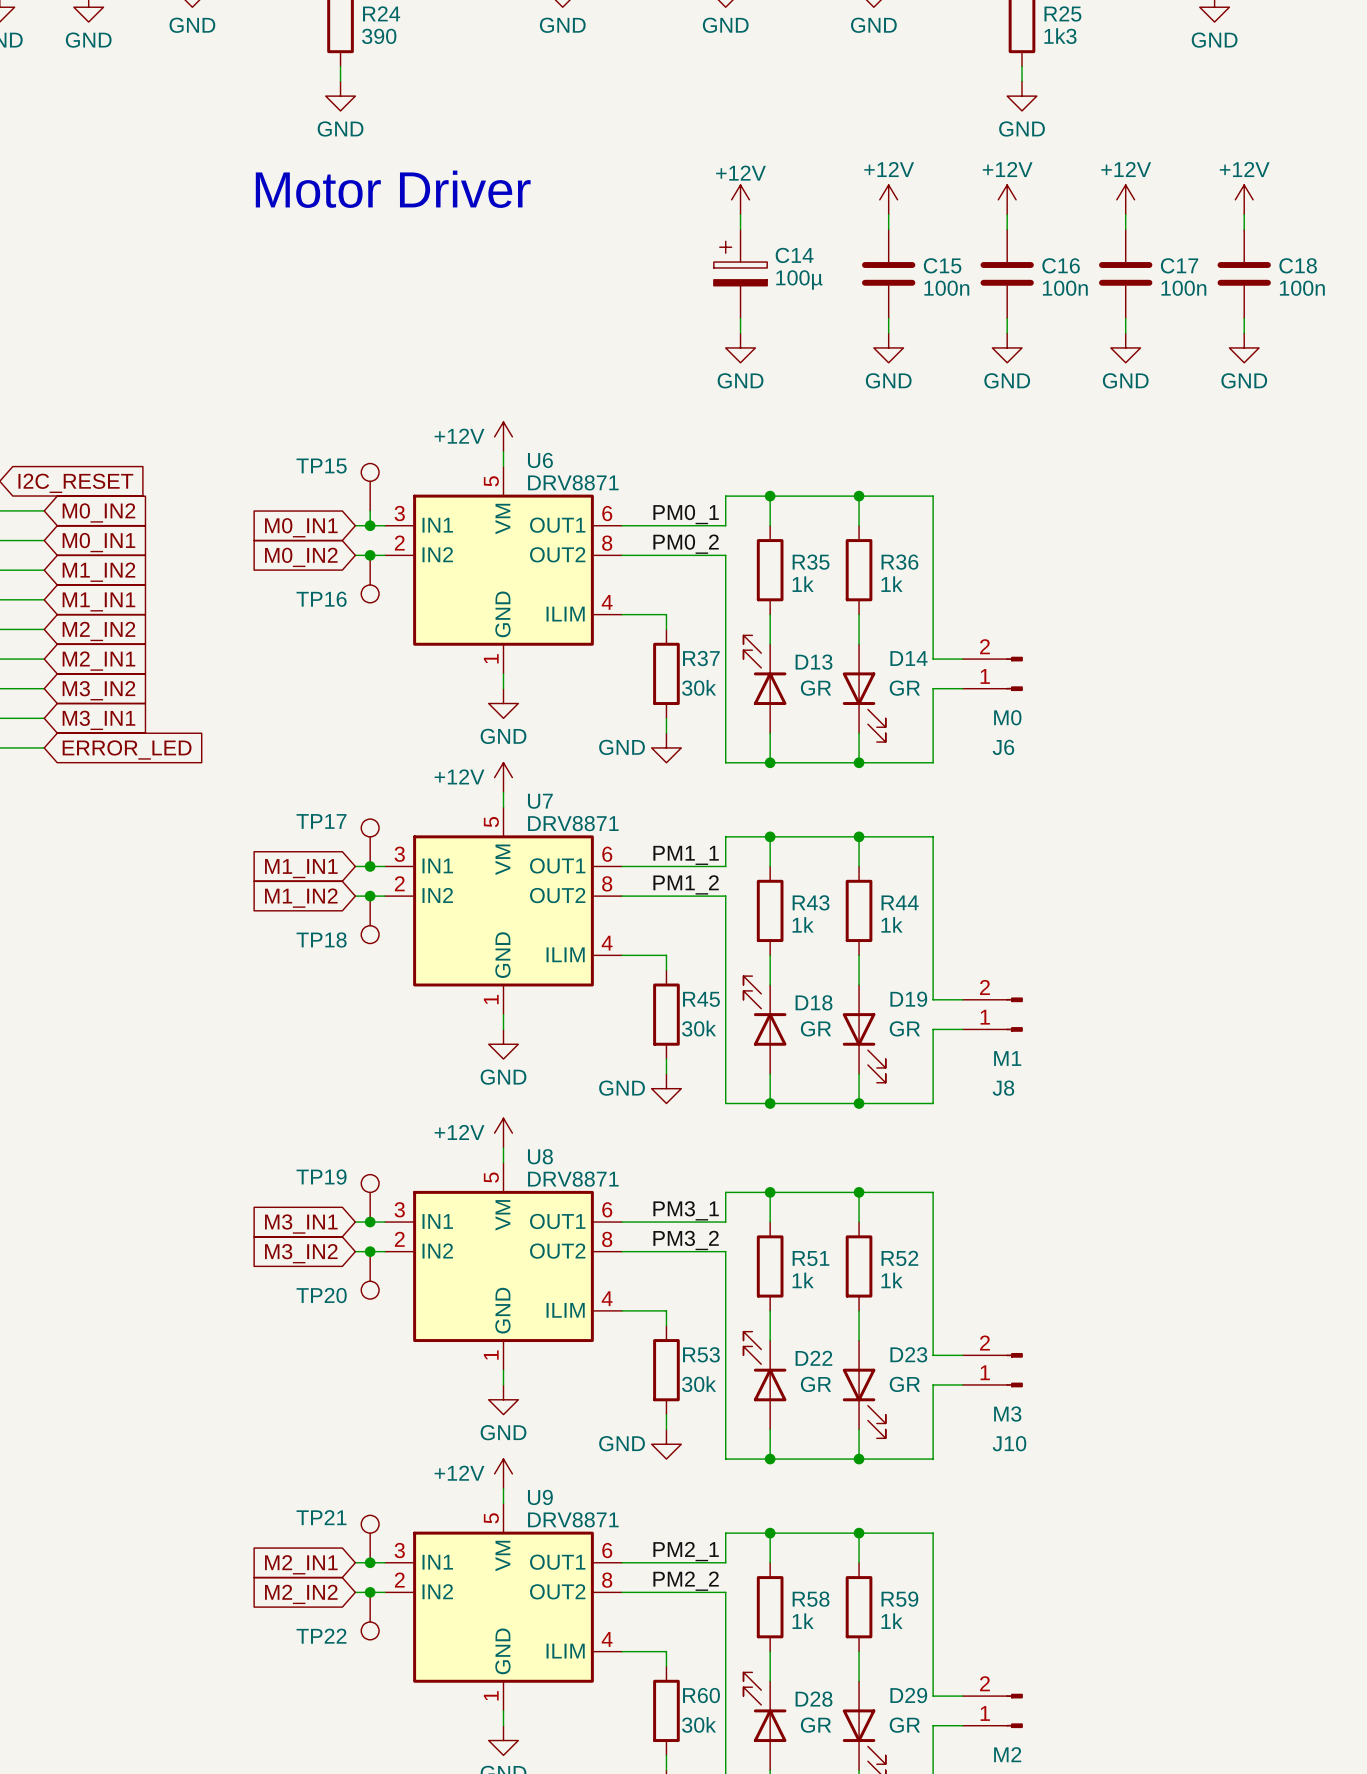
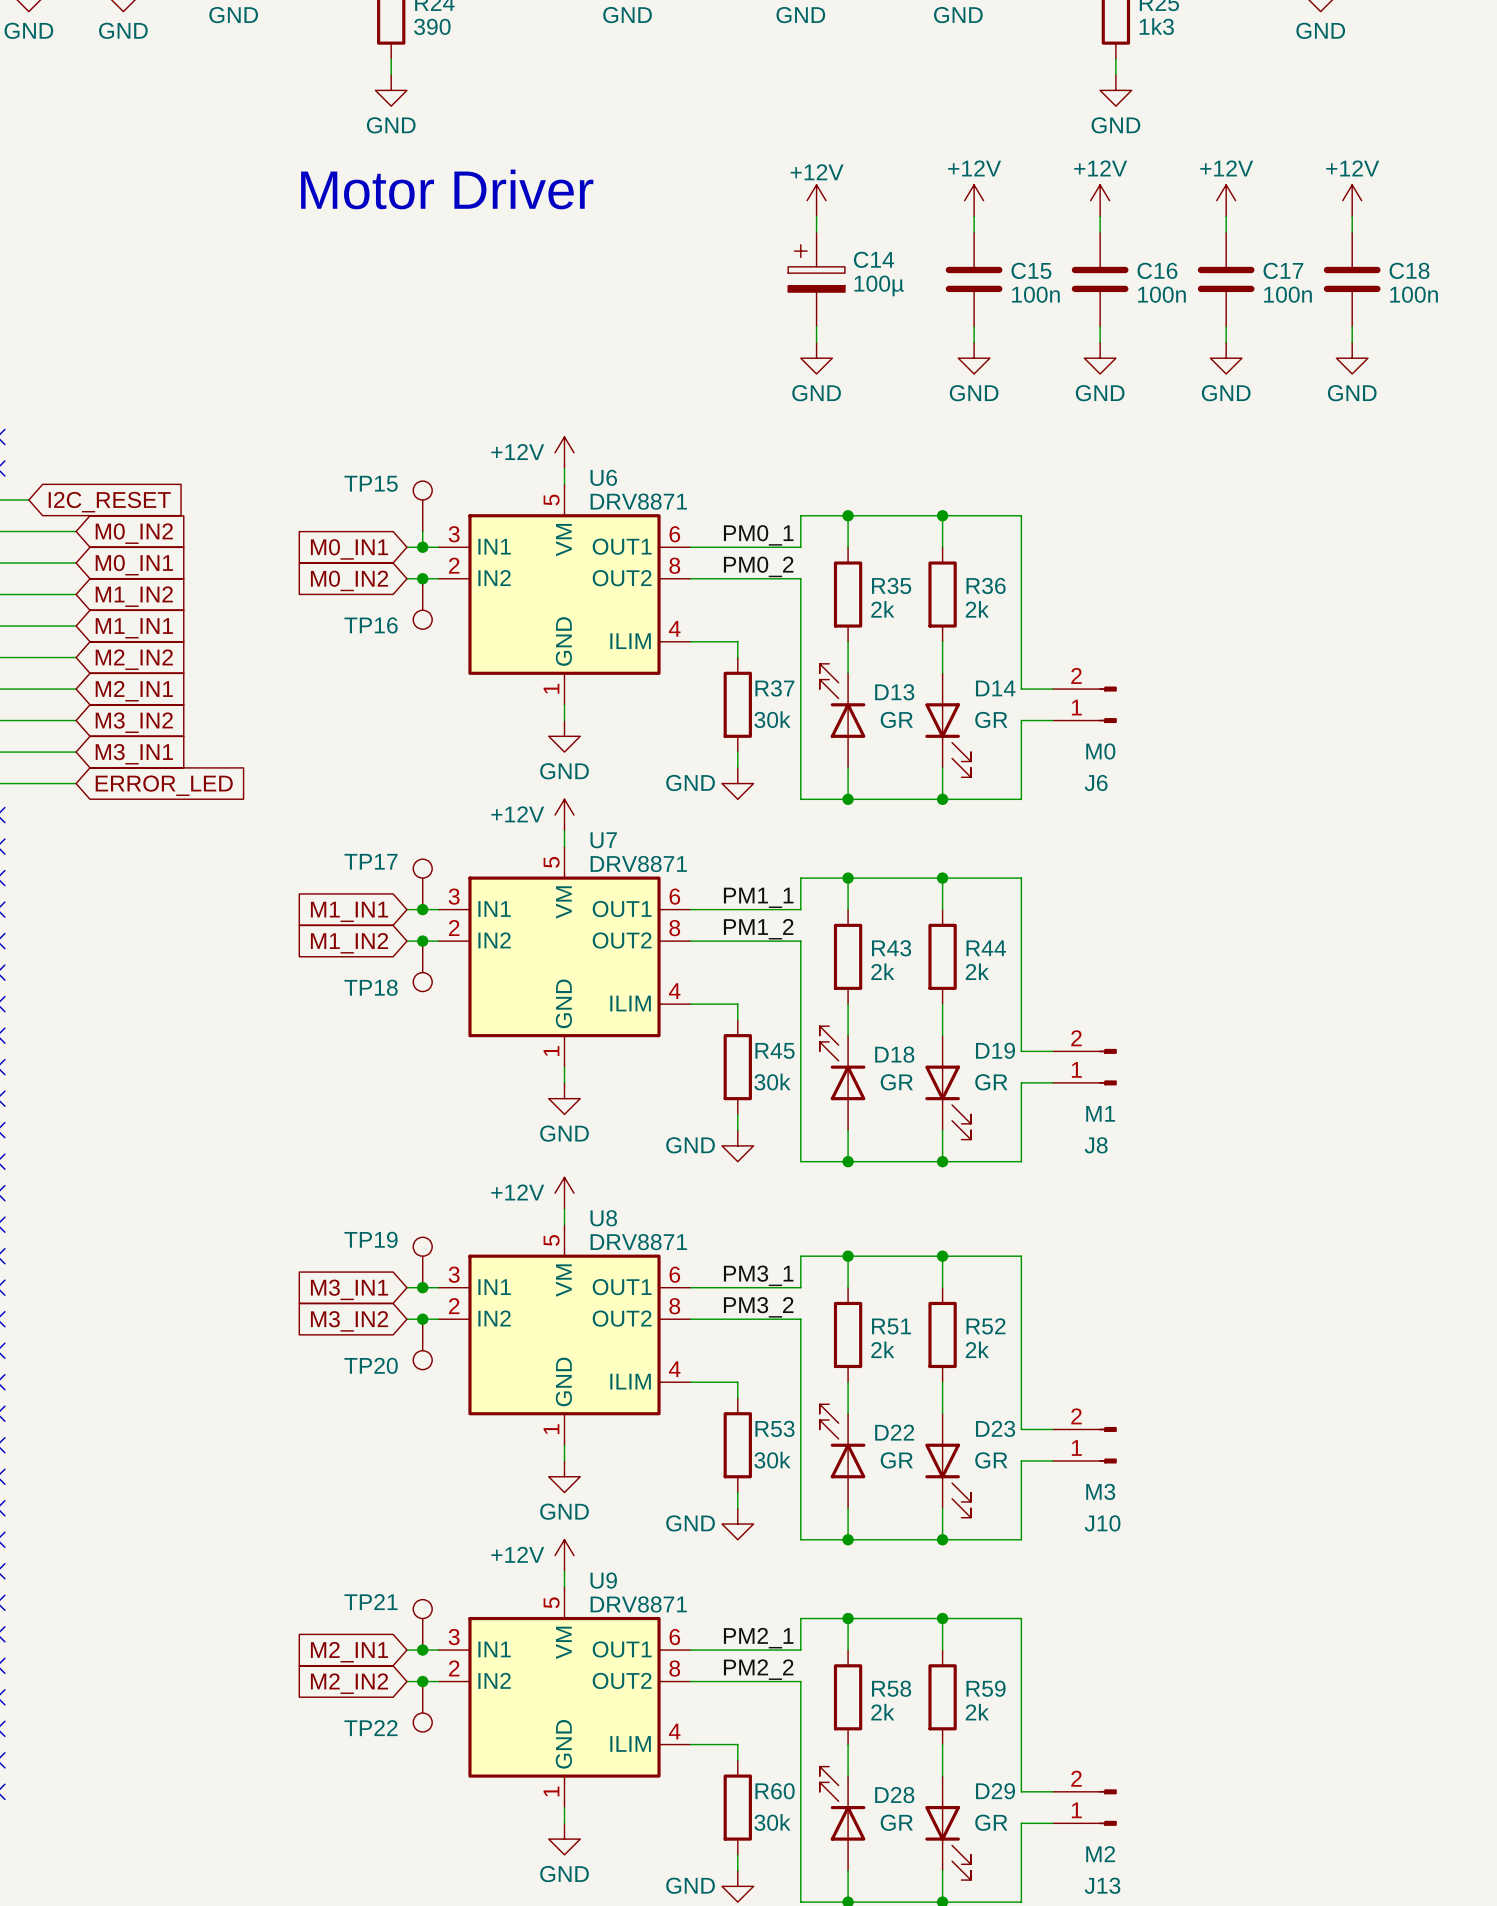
R35 value: 1k (803, 584) -> 2k (882, 609)
R36 value: 1k (891, 584) -> 2k (977, 609)
R43 value: 1k (803, 924) -> 2k (882, 971)
R44 value: 1k (891, 924) -> 2k (977, 971)
R51 value: 1k (803, 1280) -> 2k (882, 1349)
R52 value: 1k (891, 1280) -> 2k (977, 1349)
R58 value: 1k (803, 1621) -> 2k (882, 1712)
R59 value: 1k (891, 1621) -> 2k (977, 1712)

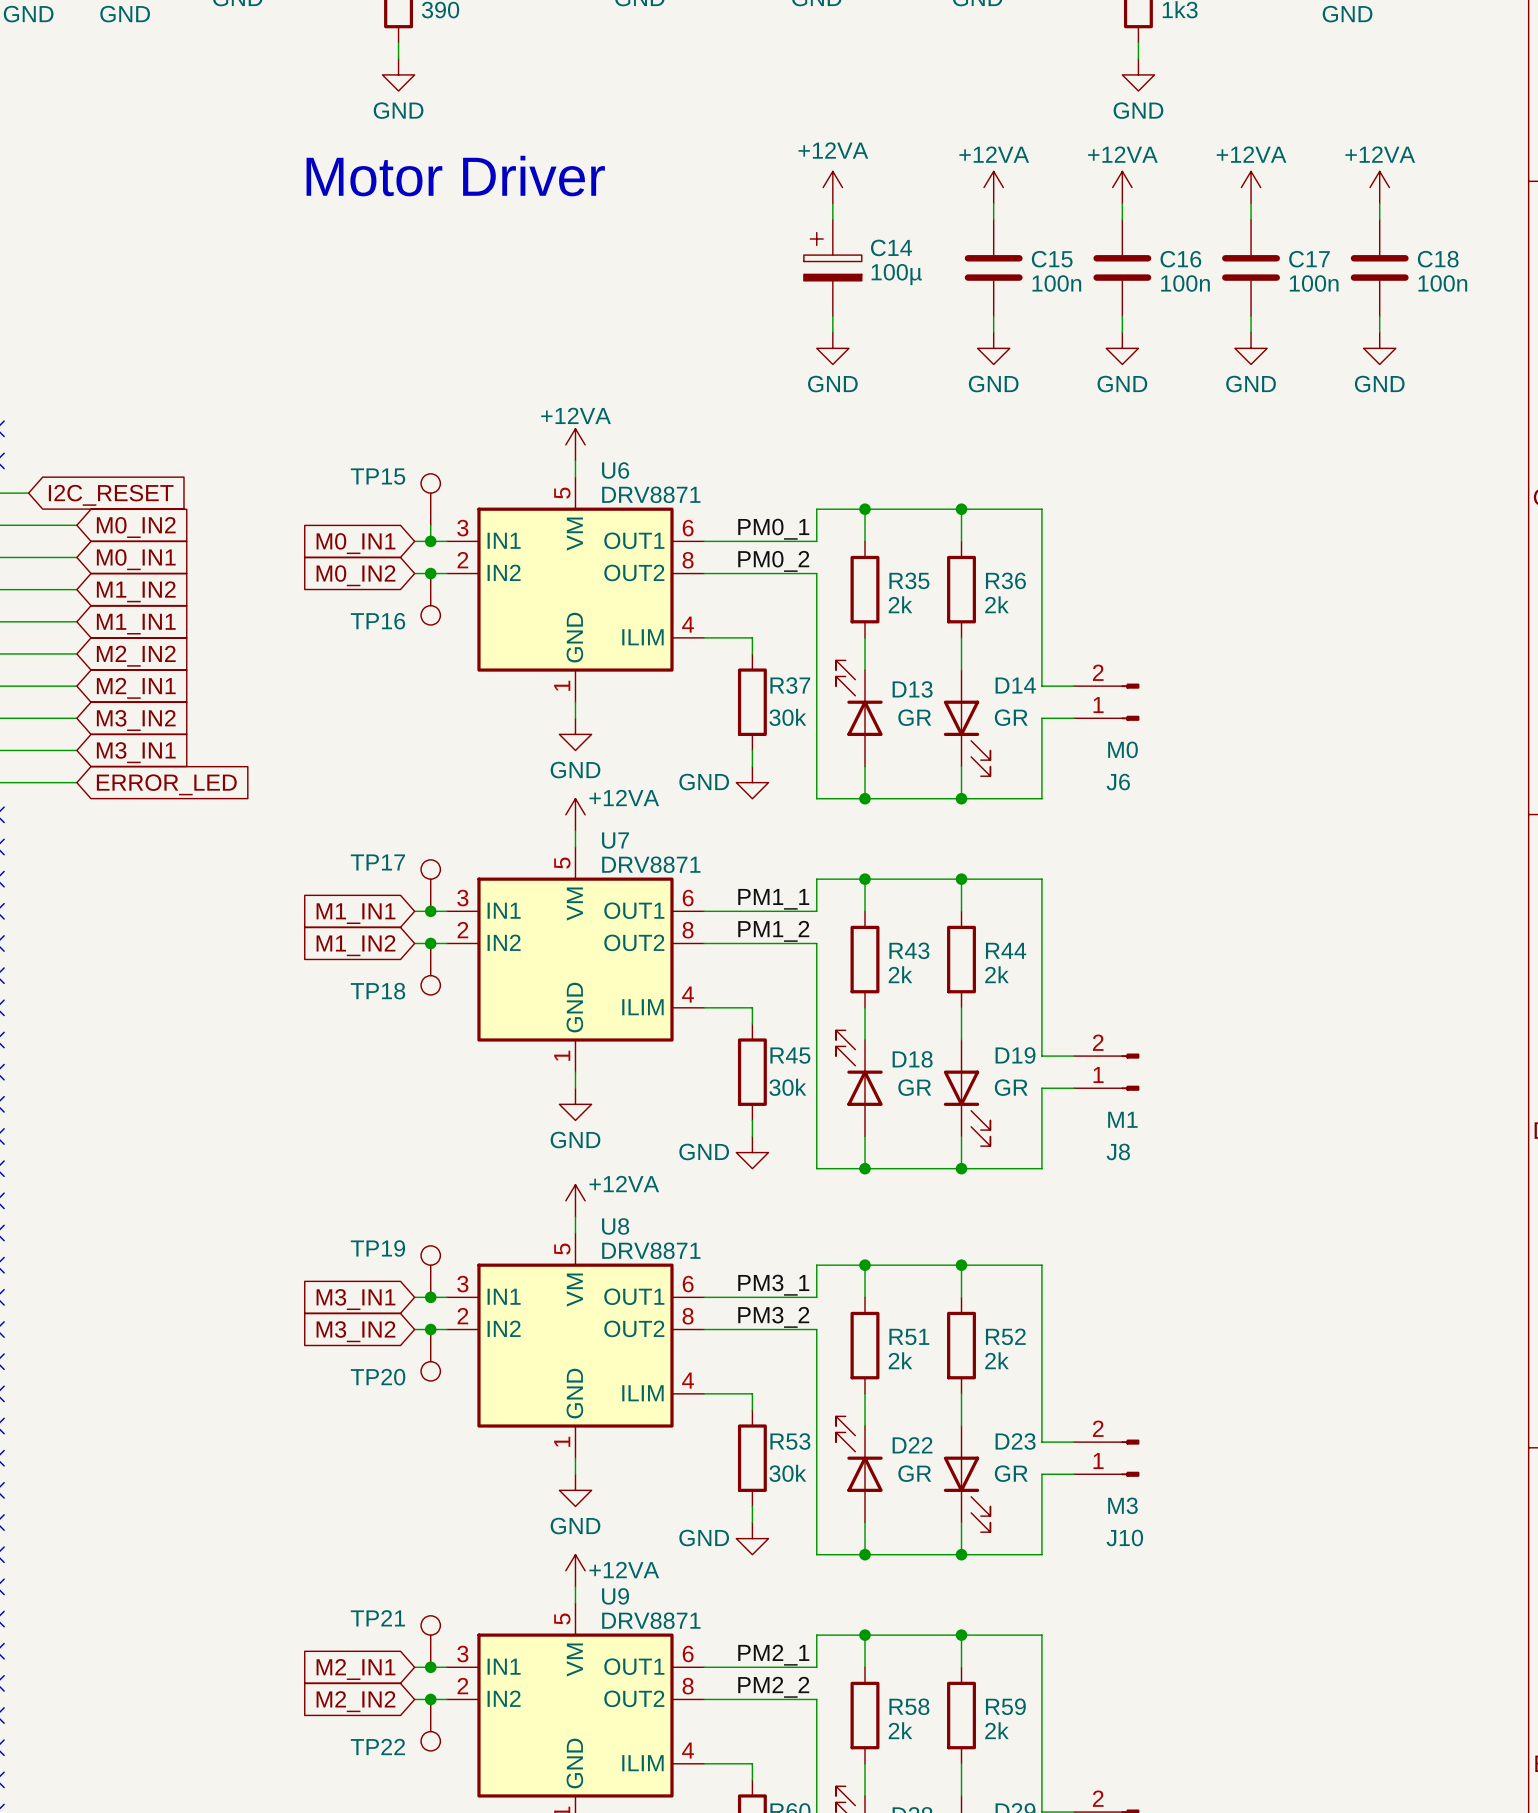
power symbol: +12V (816, 200) -> +12VA (832, 187)
power symbol: +12V (974, 200) -> +12VA (993, 187)
power symbol: +12V (1100, 200) -> +12VA (1122, 187)
power symbol: +12V (1226, 200) -> +12VA (1251, 187)
power symbol: +12V (1352, 200) -> +12VA (1379, 187)
power symbol: +12V (564, 452) -> +12VA (575, 444)
power symbol: +12V (564, 815) -> +12VA (575, 814)
power symbol: +12V (564, 1193) -> +12VA (575, 1200)
power symbol: +12V (564, 1555) -> +12VA (575, 1570)

